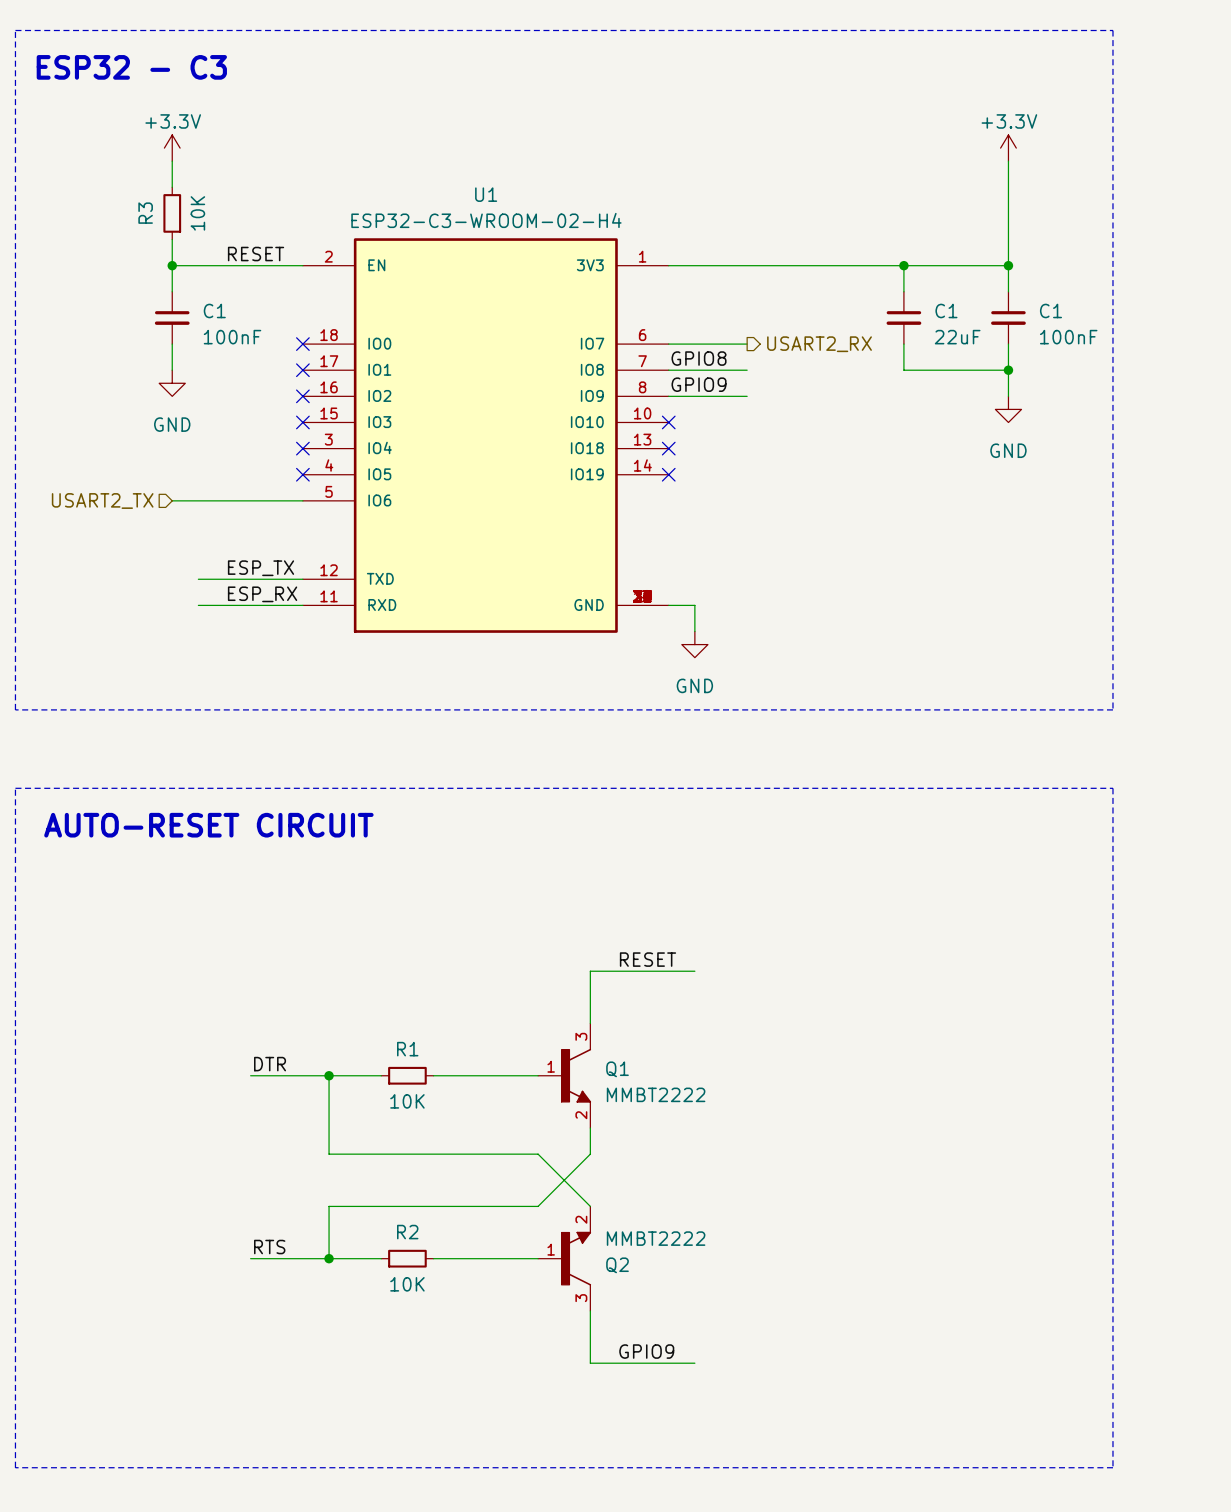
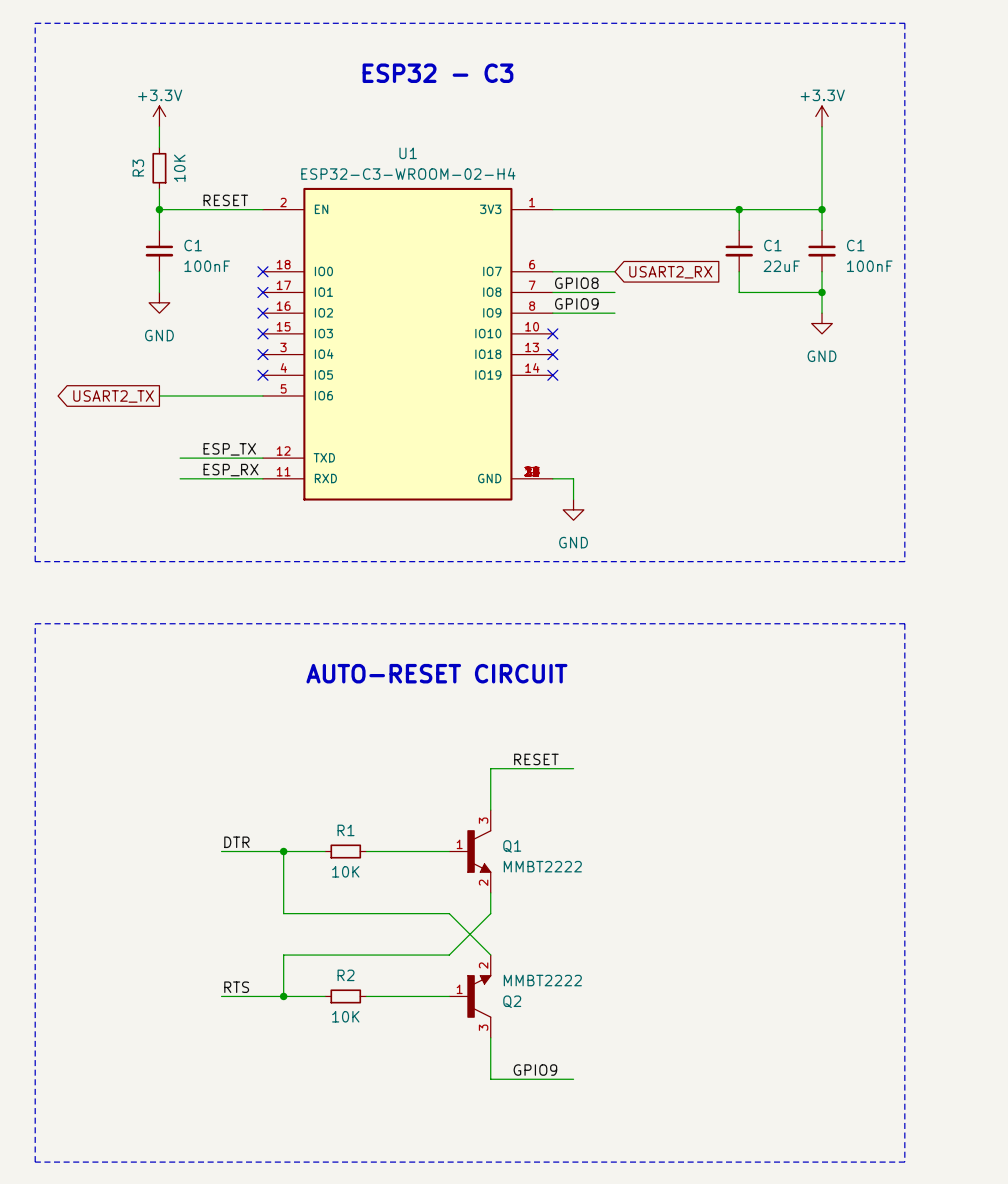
text: ESP32 - C3 (131, 67) -> none
text: none -> ESP32 - C3 (437, 73)
global label: none -> USART2_RX (670, 272)
hierarchical label: USART2_RX (819, 344) -> none
hierarchical label: USART2_TX (102, 501) -> none
global label: none -> USART2_TX (113, 396)
text: AUTO-RESET CIRCUIT (208, 825) -> none
text: none -> AUTO-RESET CIRCUIT (436, 673)

